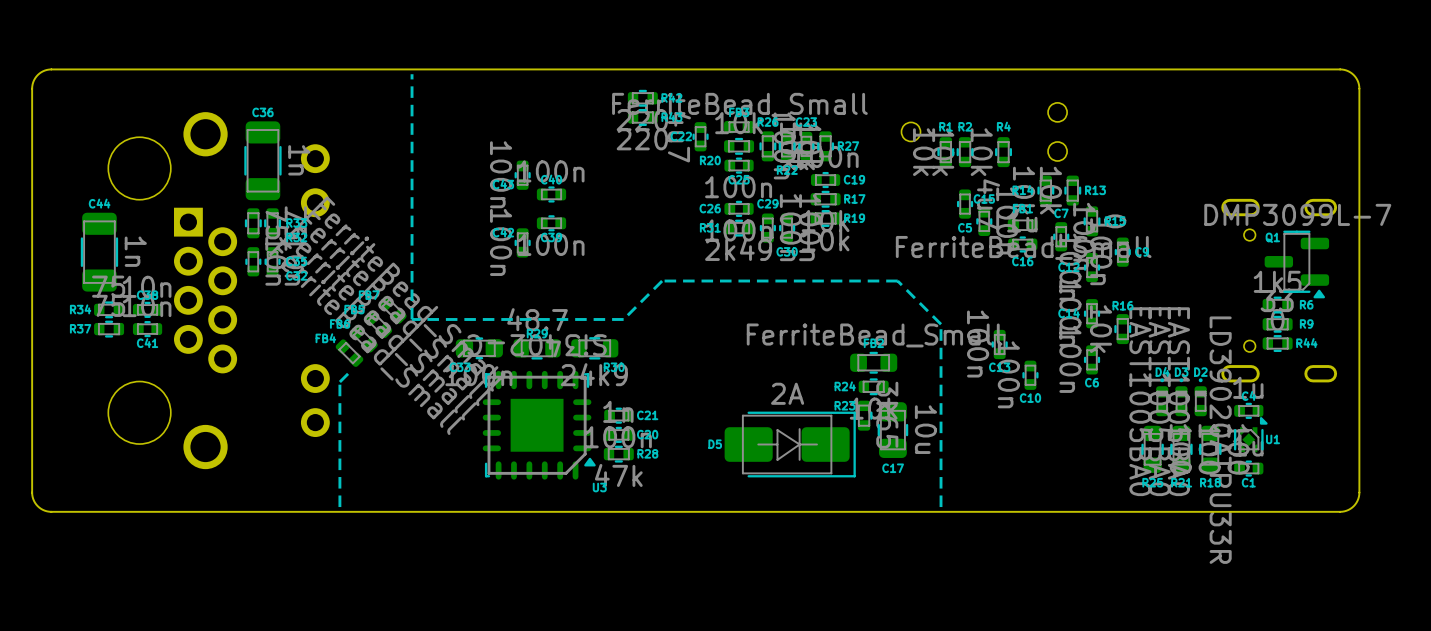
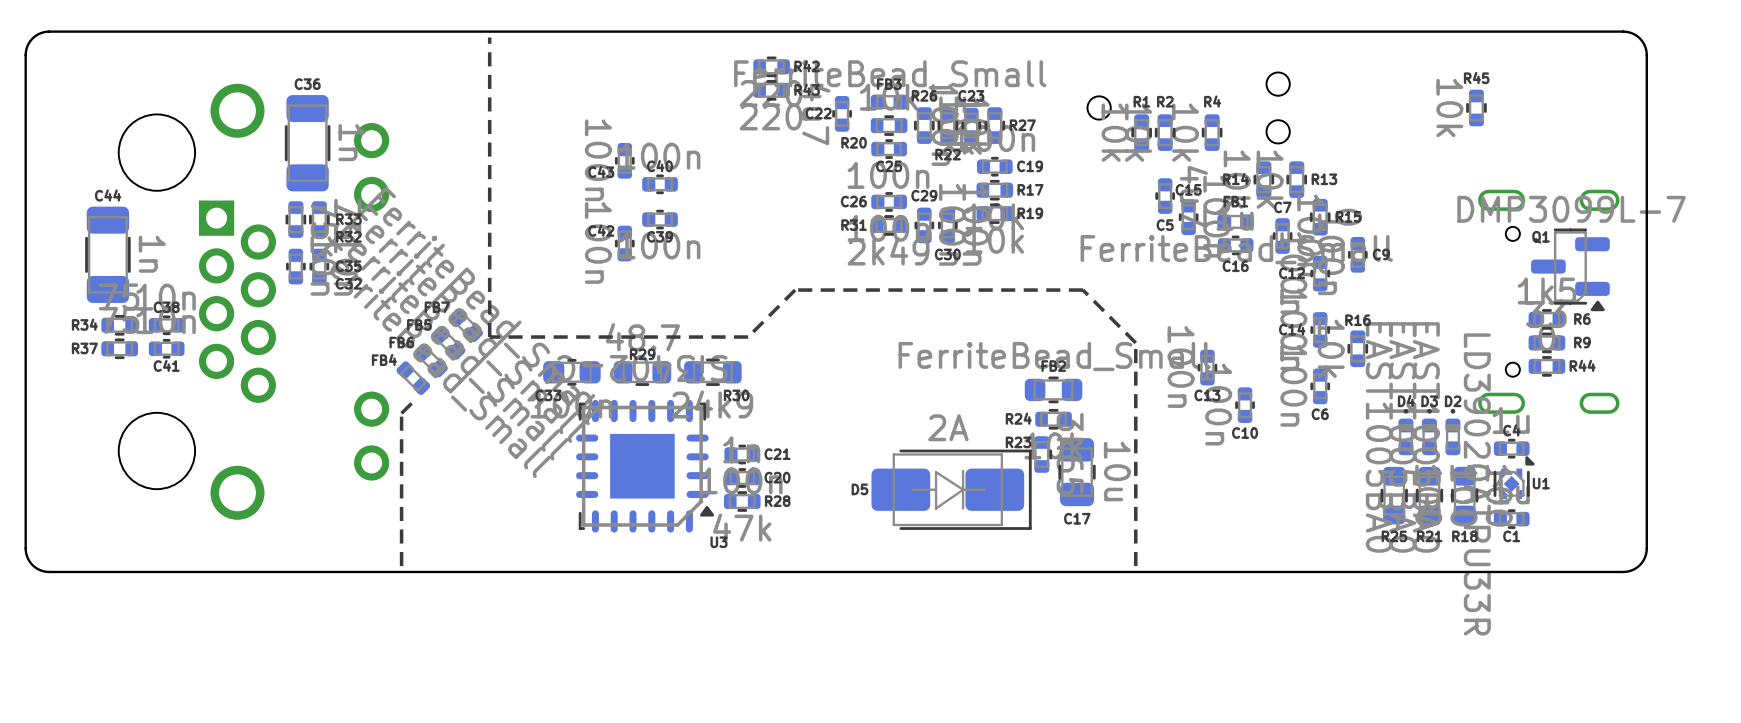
R45: none -> 10k (1476, 107)

